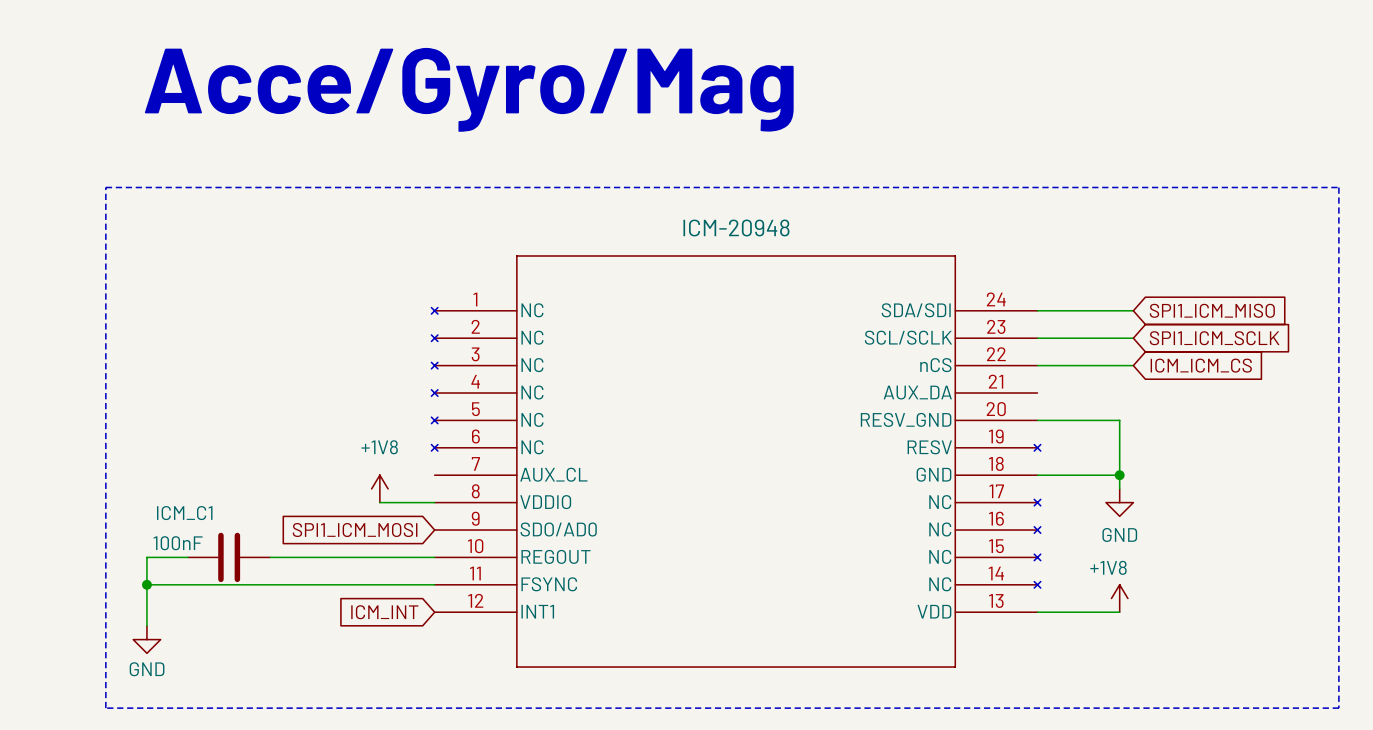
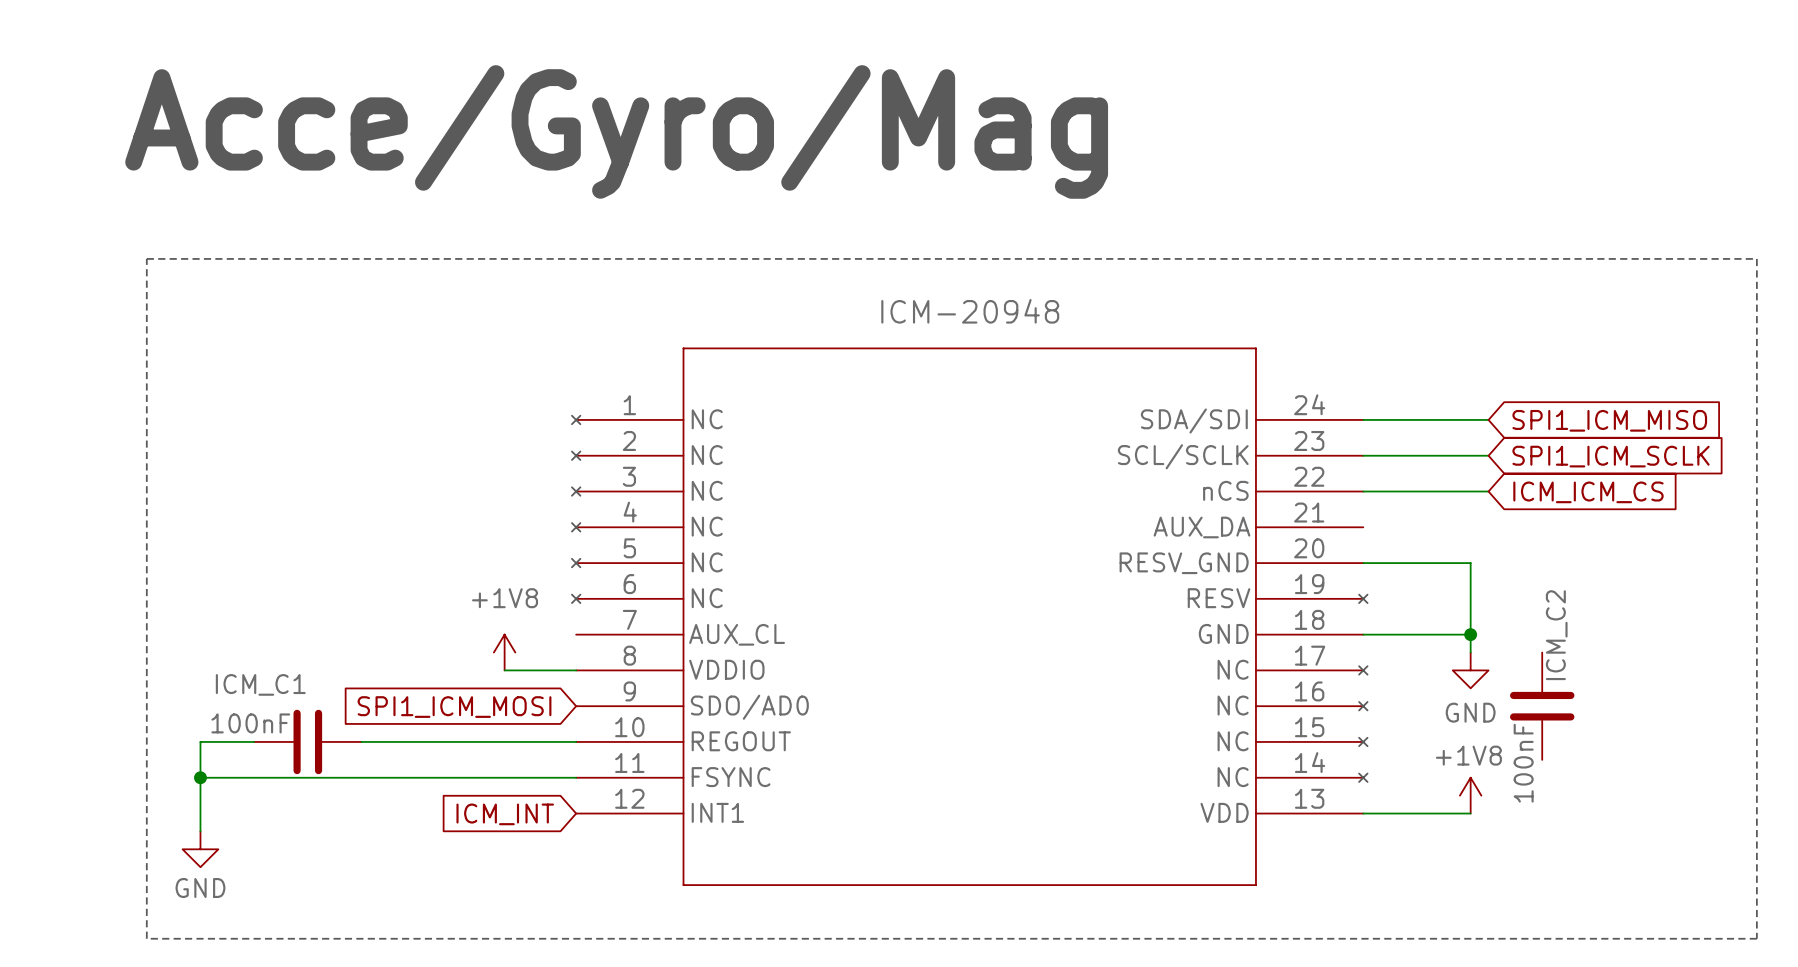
ICM_C2: none -> 100nF (1542, 706)

